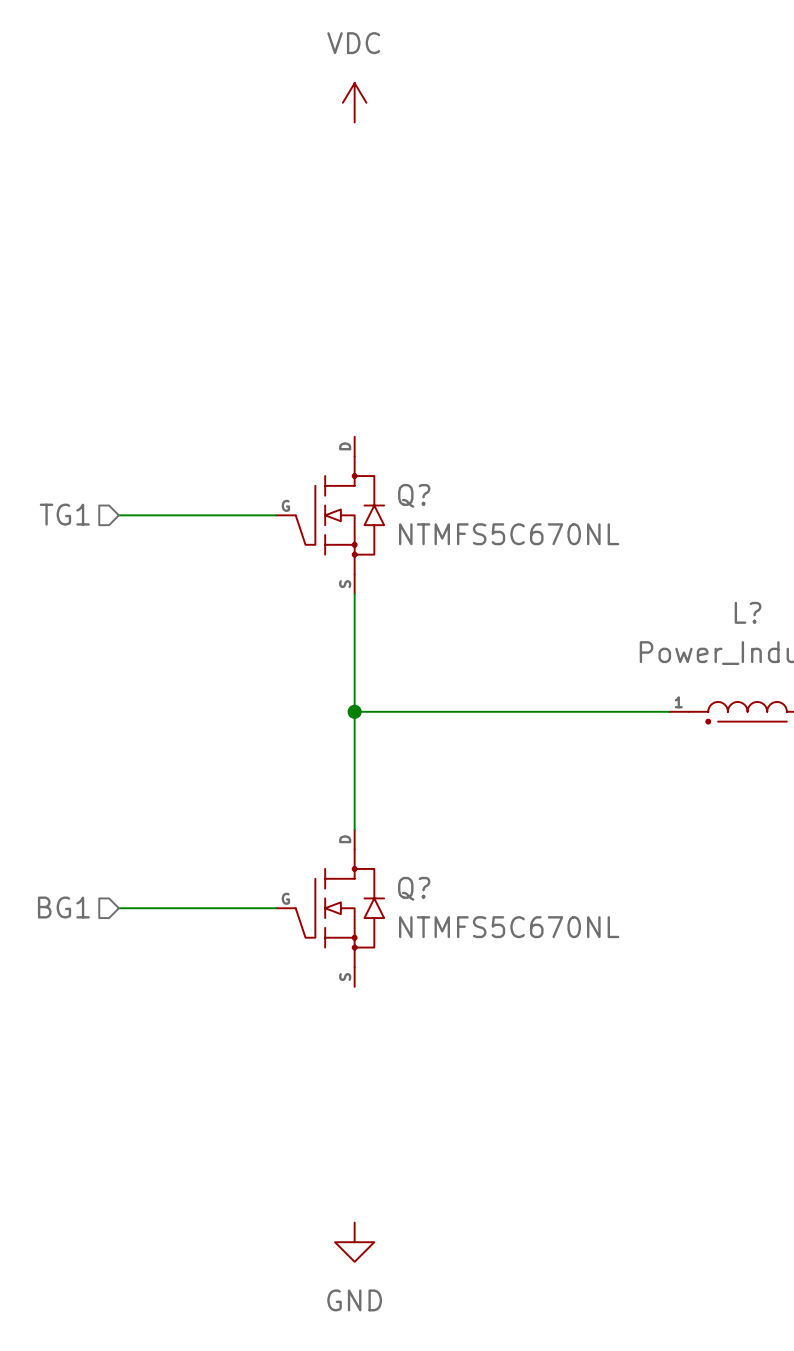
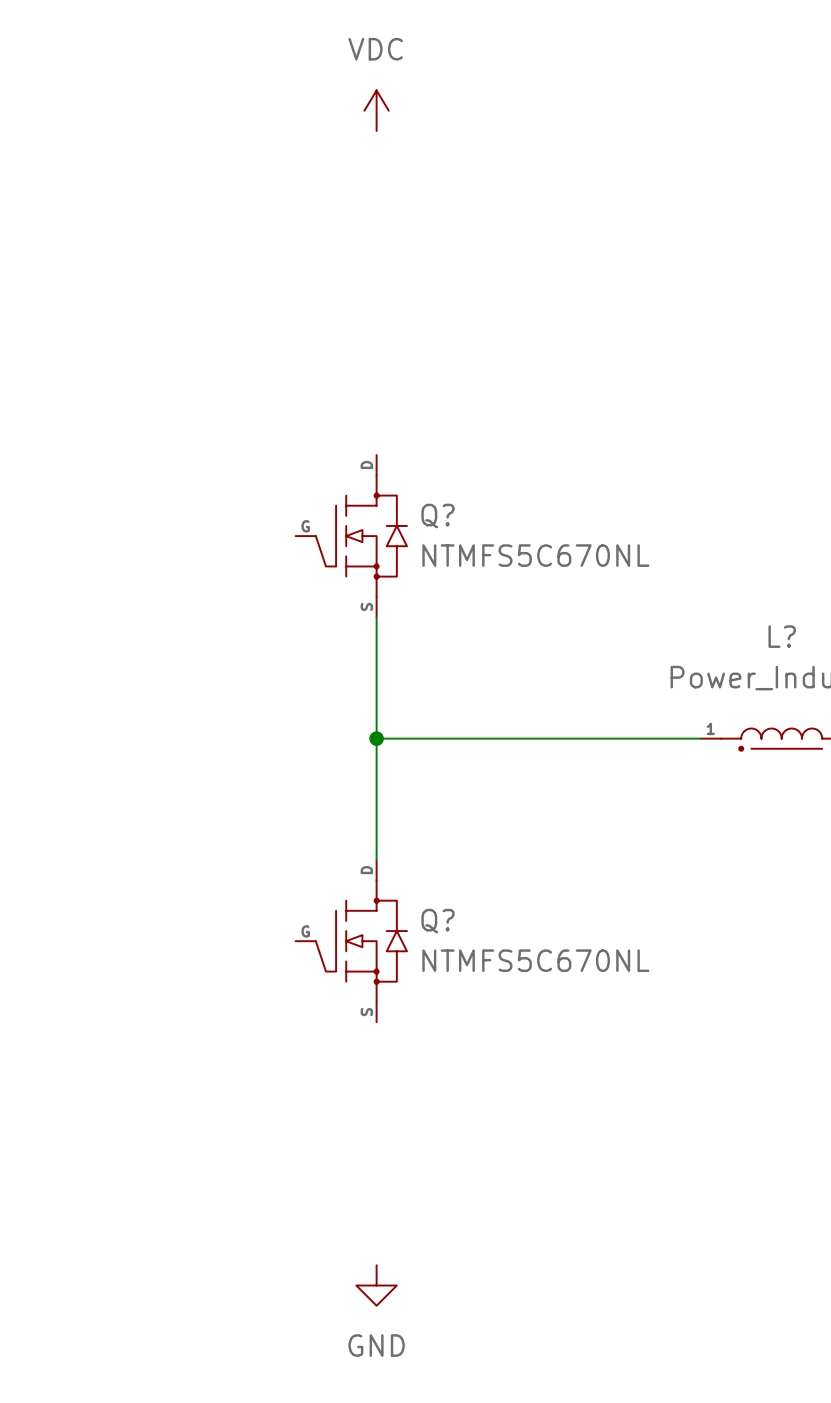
hierarchical label: TG1 (64, 514) -> none
wire: (118, 515) (276, 515) -> none
hierarchical label: BG1 (63, 907) -> none
wire: (118, 908) (276, 908) -> none

